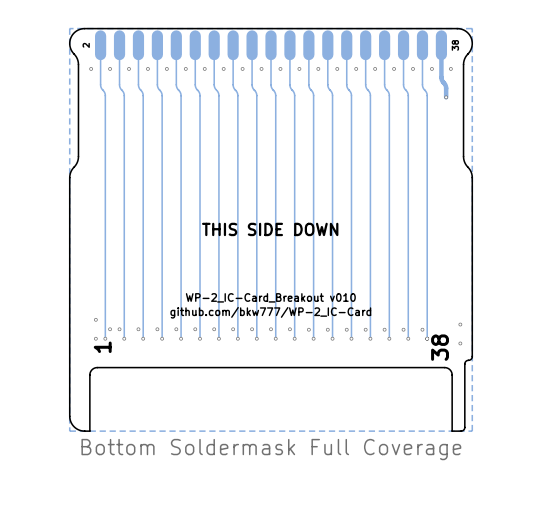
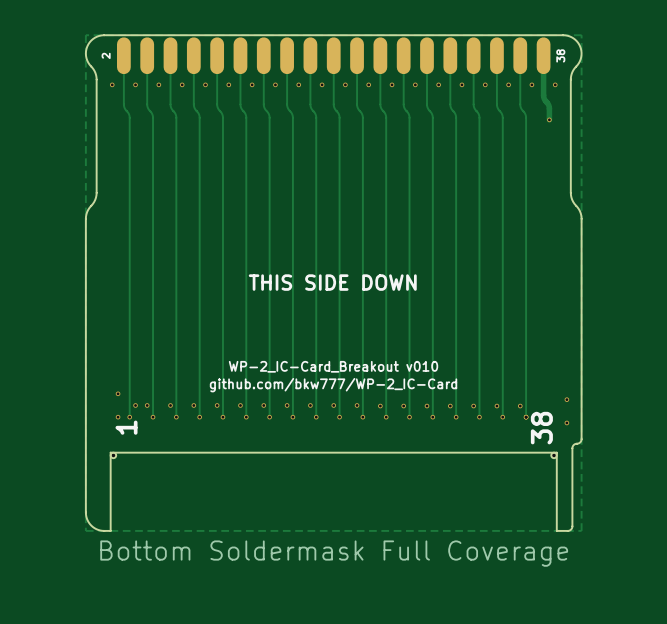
board edge: none -> (563, 35) (104, 35) (91, 40) (85, 53) (87, 60) (96, 77) (96, 192) (85, 218) (85, 512) (91, 525) (100, 530) (110, 530) (110, 452) (556, 452) (556, 530) (571, 529) (572, 447) (581, 439) (581, 218) (580, 211) (570, 195) (570, 79) (573, 70) (579, 61) (581, 52) (576, 41) (571, 37) (563, 35)
part: (271, 229) -> none
part: none -> (113, 455)
part: none -> (554, 455)

